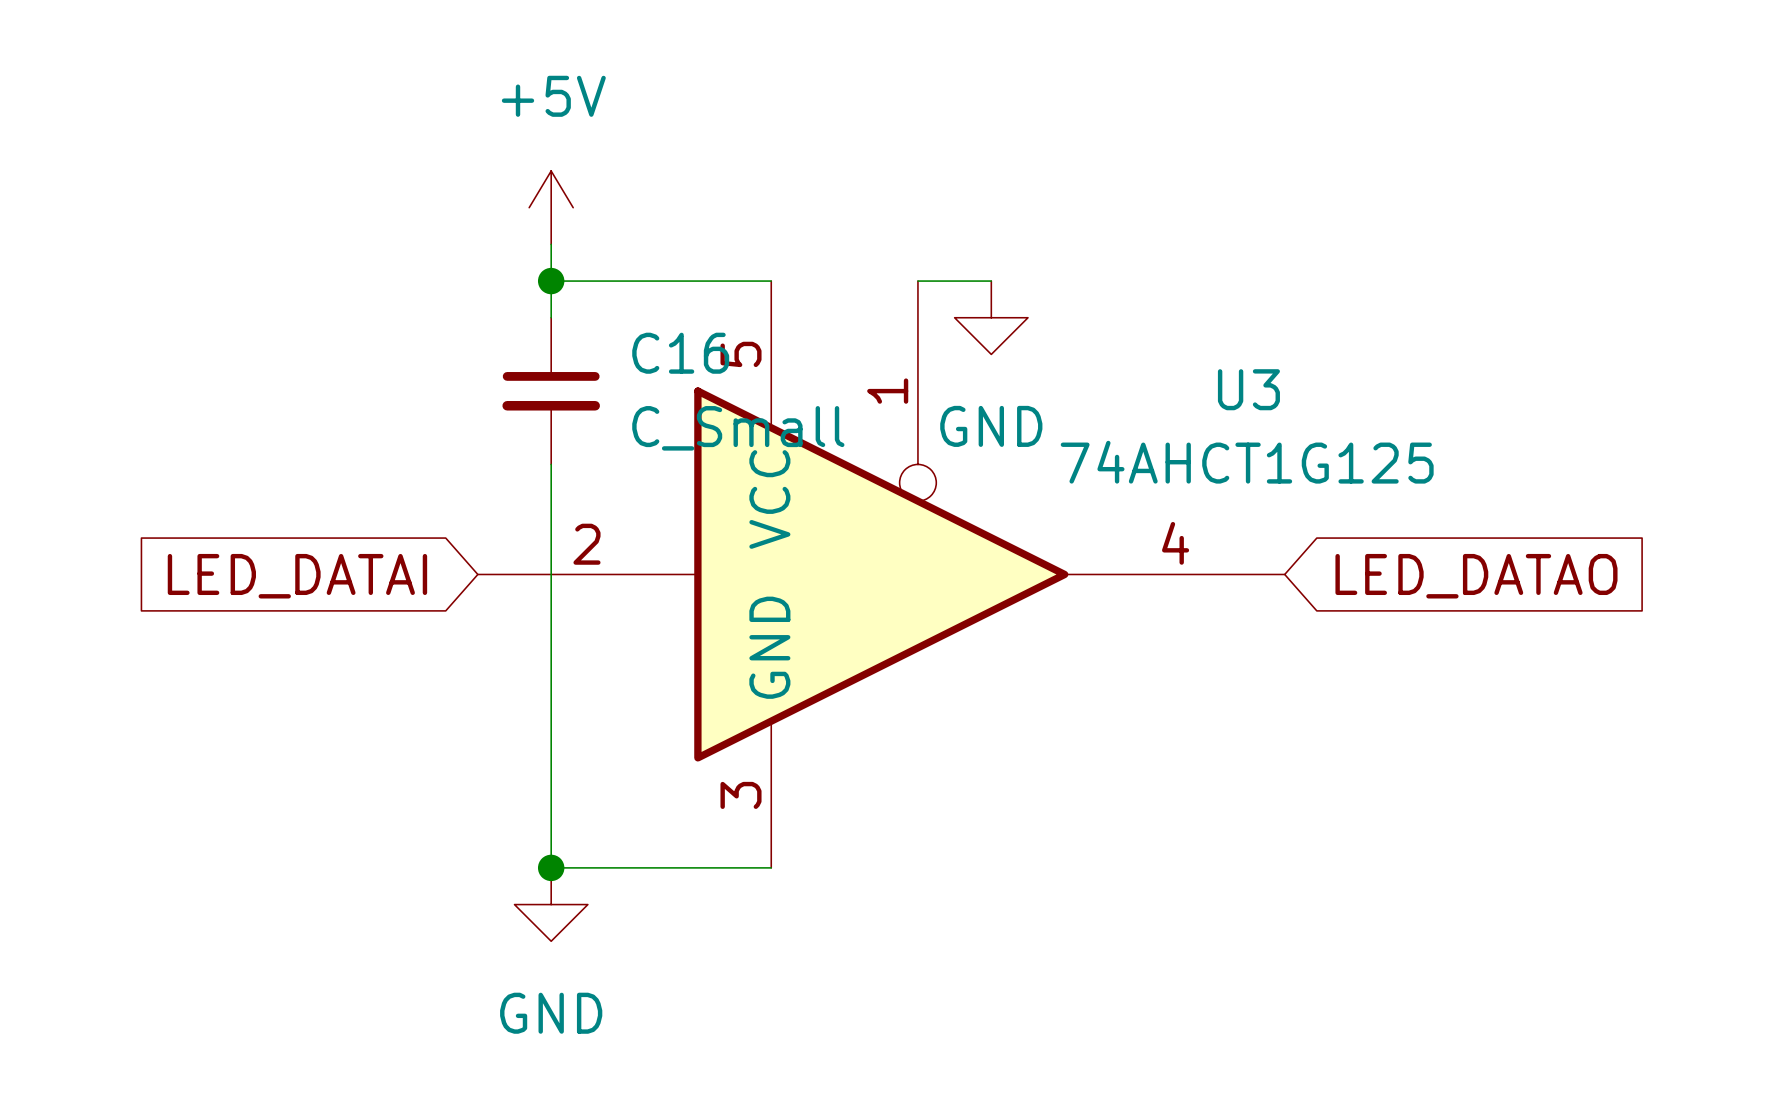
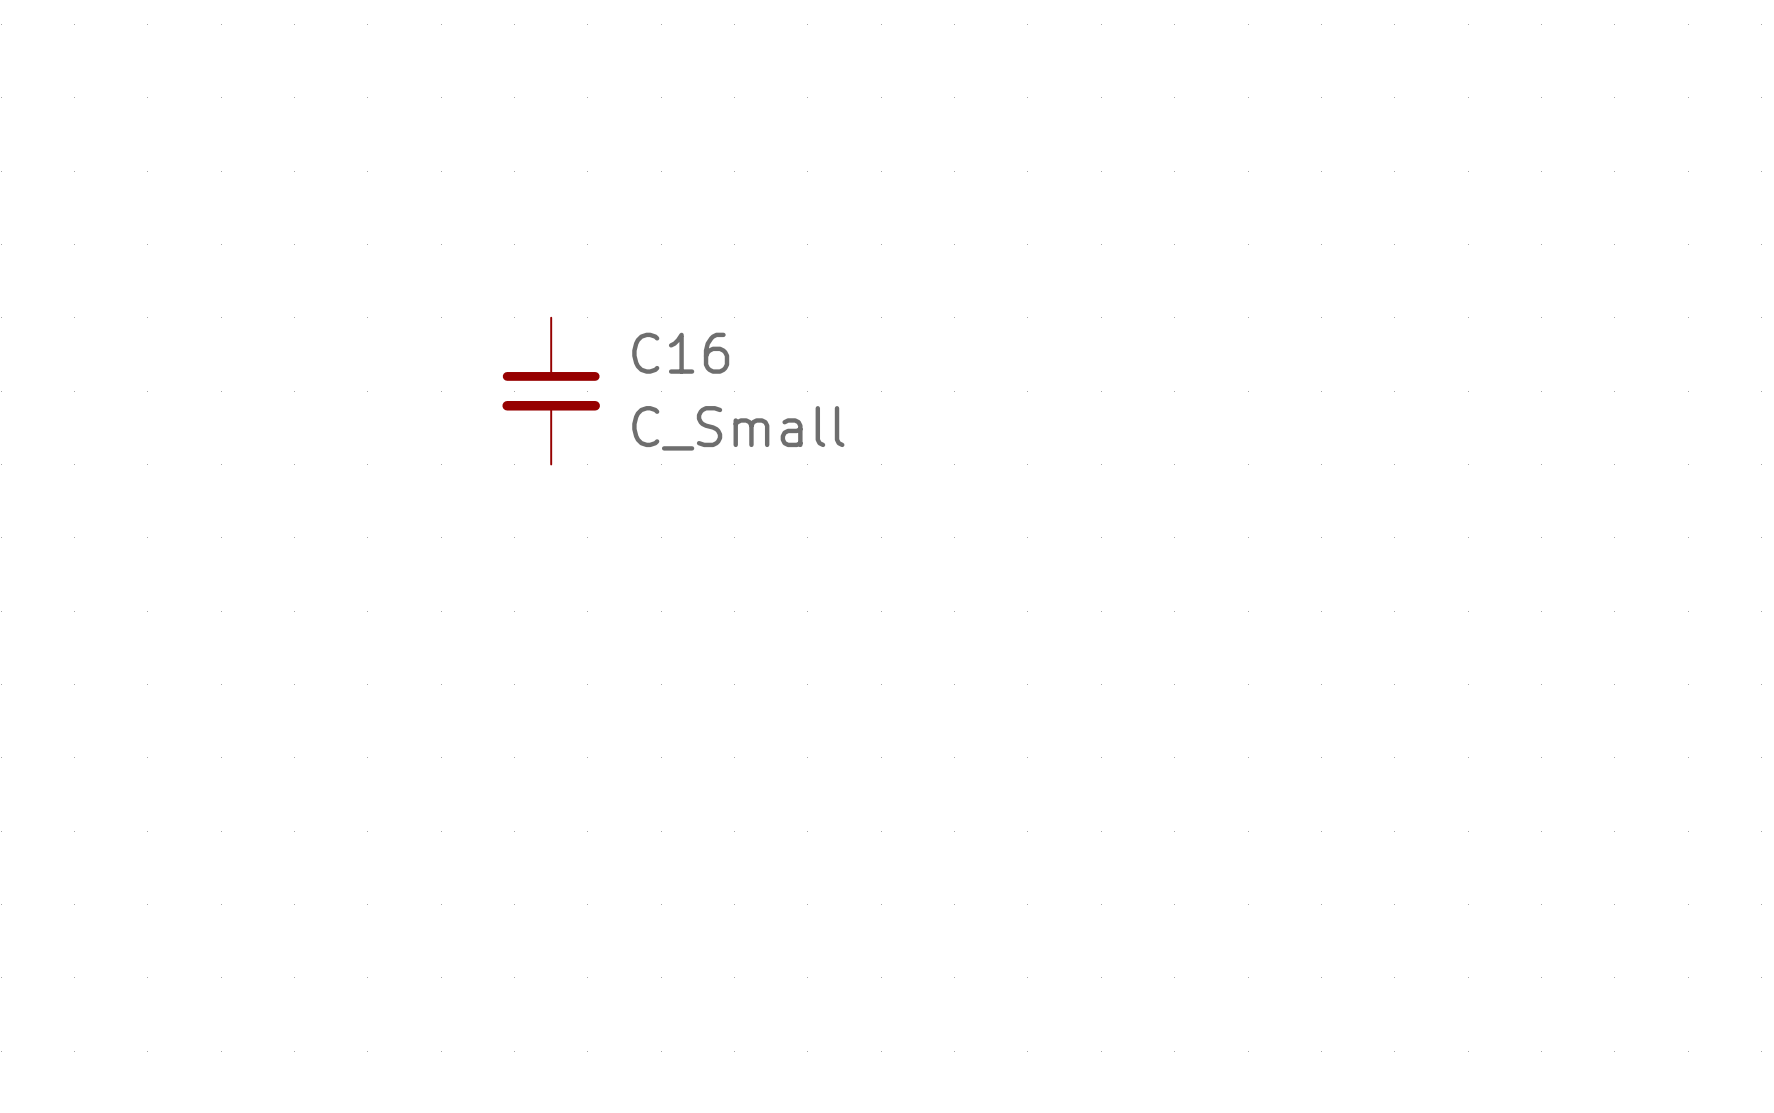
power symbol: +5V (551, 207) -> none
wire: (551, 244) (551, 317) -> none
wire: (551, 281) (771, 281) -> none
junction: (551, 281) -> none
wire: (917, 281) (991, 281) -> none
power symbol: GND (991, 317) -> none
wire: (551, 464) (551, 867) (771, 867) -> none
U3: 74AHCT1G125 (881, 574) -> none
global label: LED_DATAI (297, 576) -> none
global label: LED_DATAO (1476, 576) -> none
junction: (551, 867) -> none
power symbol: GND (551, 904) -> none

